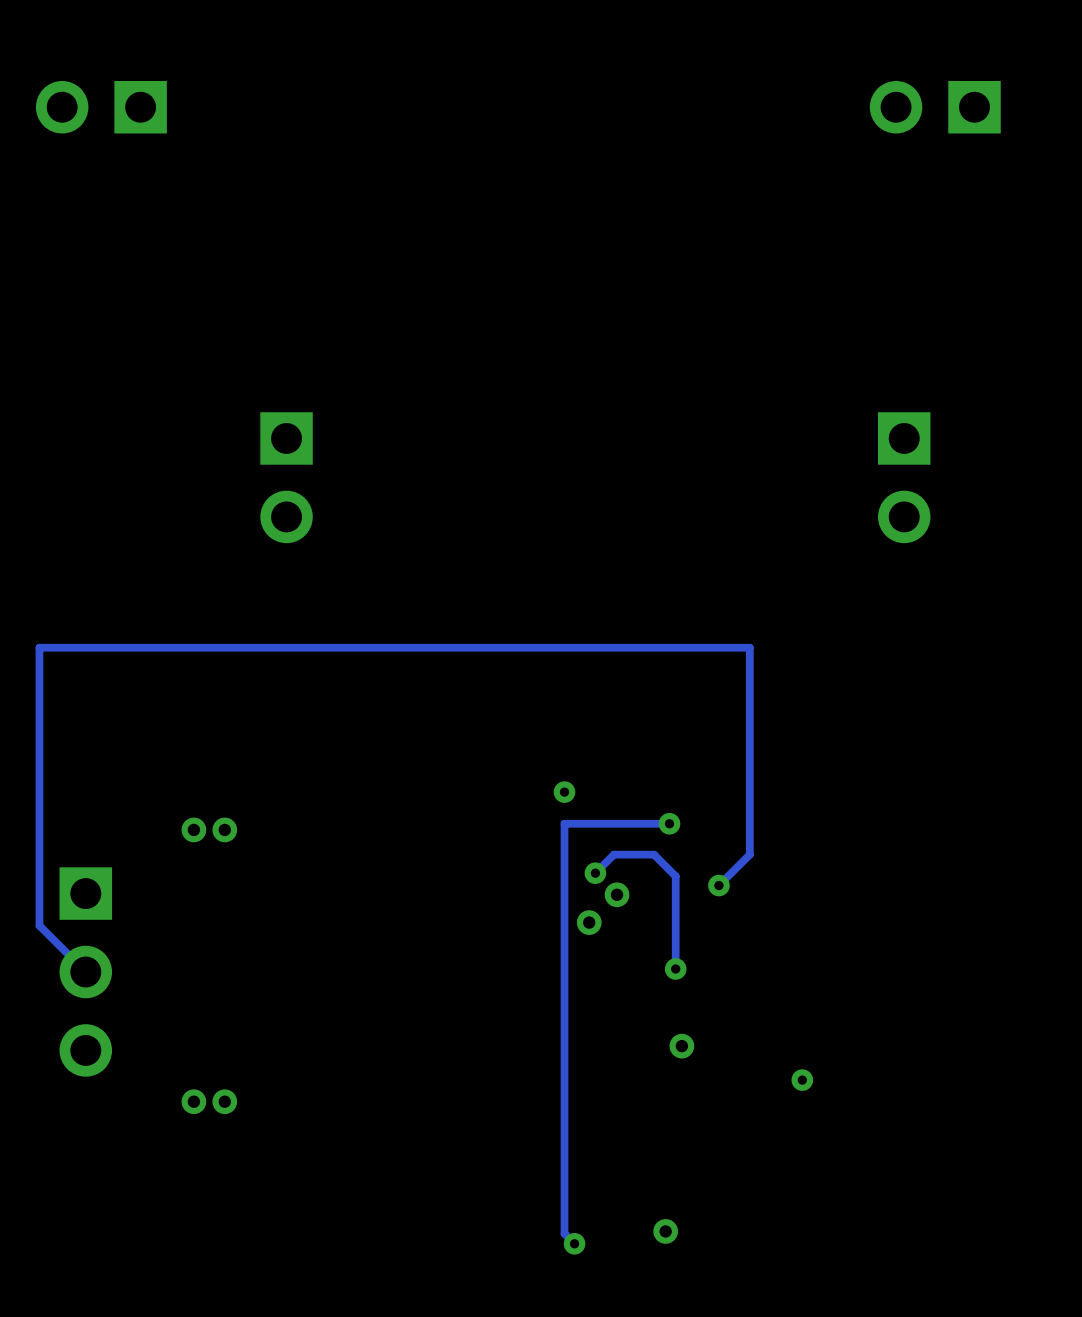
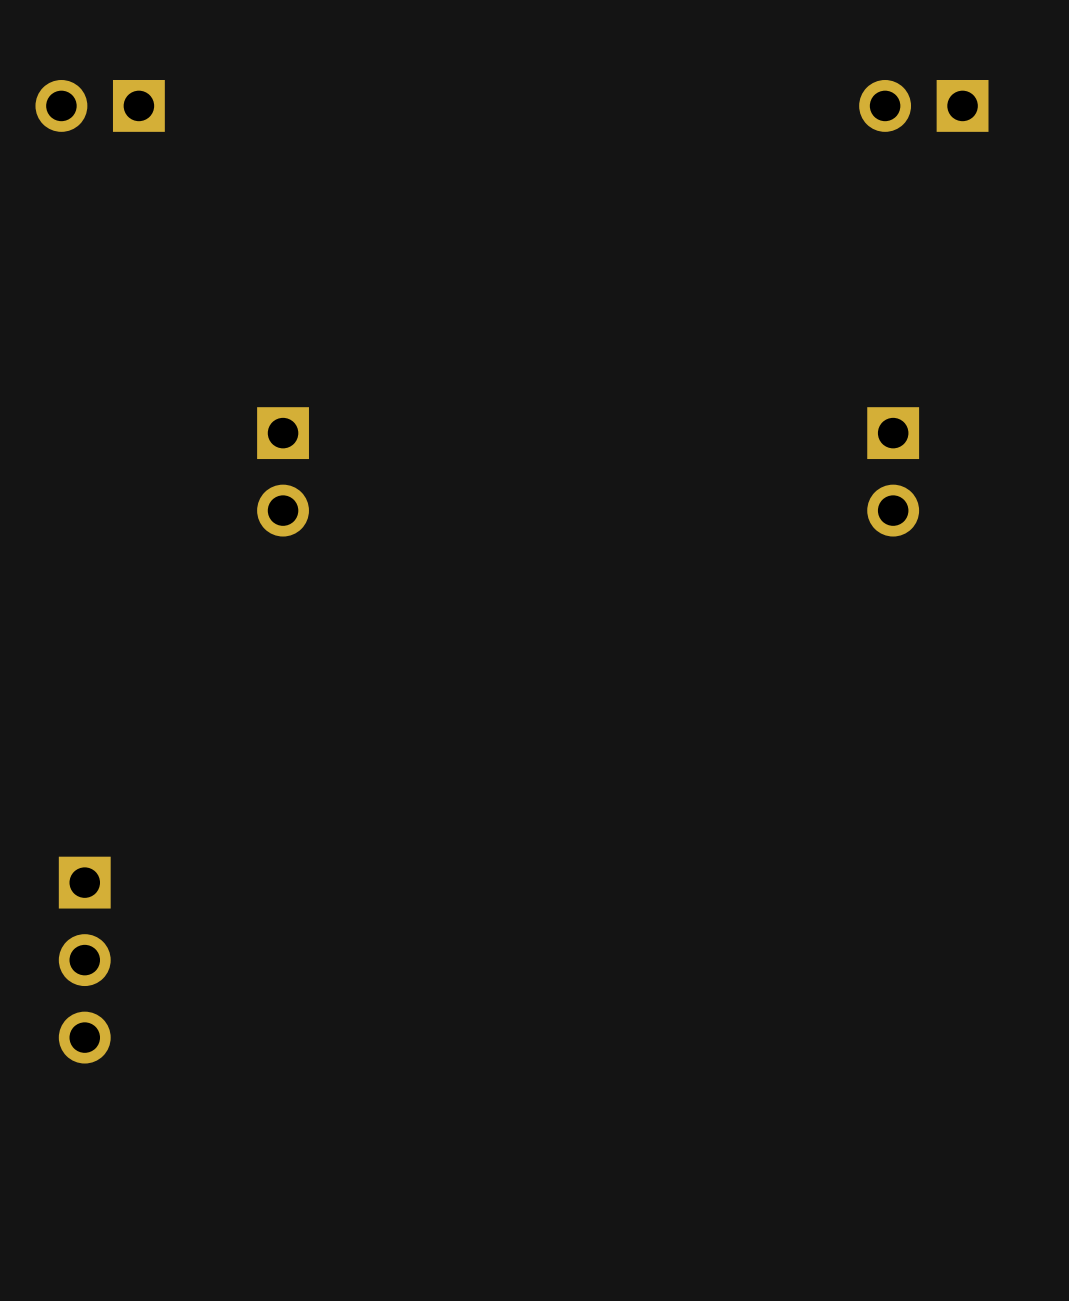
via: (564, 792) -> none
track: (669, 823) (564, 823) (564, 1233) (574, 1243) -> none
via: (669, 823) -> none
via: (193, 829) -> none
via: (224, 829) -> none
track: (595, 873) (613, 854) (654, 854) (675, 876) (675, 968) -> none
via: (595, 873) -> none
track: (718, 885) (749, 854) (749, 647) (39, 647) (39, 925) (85, 972) -> none
via: (718, 885) -> none
via: (617, 894) -> none
via: (589, 922) -> none
via: (675, 968) -> none
via: (681, 1046) -> none
via: (802, 1080) -> none
via: (193, 1101) -> none
via: (224, 1101) -> none
via: (665, 1231) -> none
via: (574, 1243) -> none

